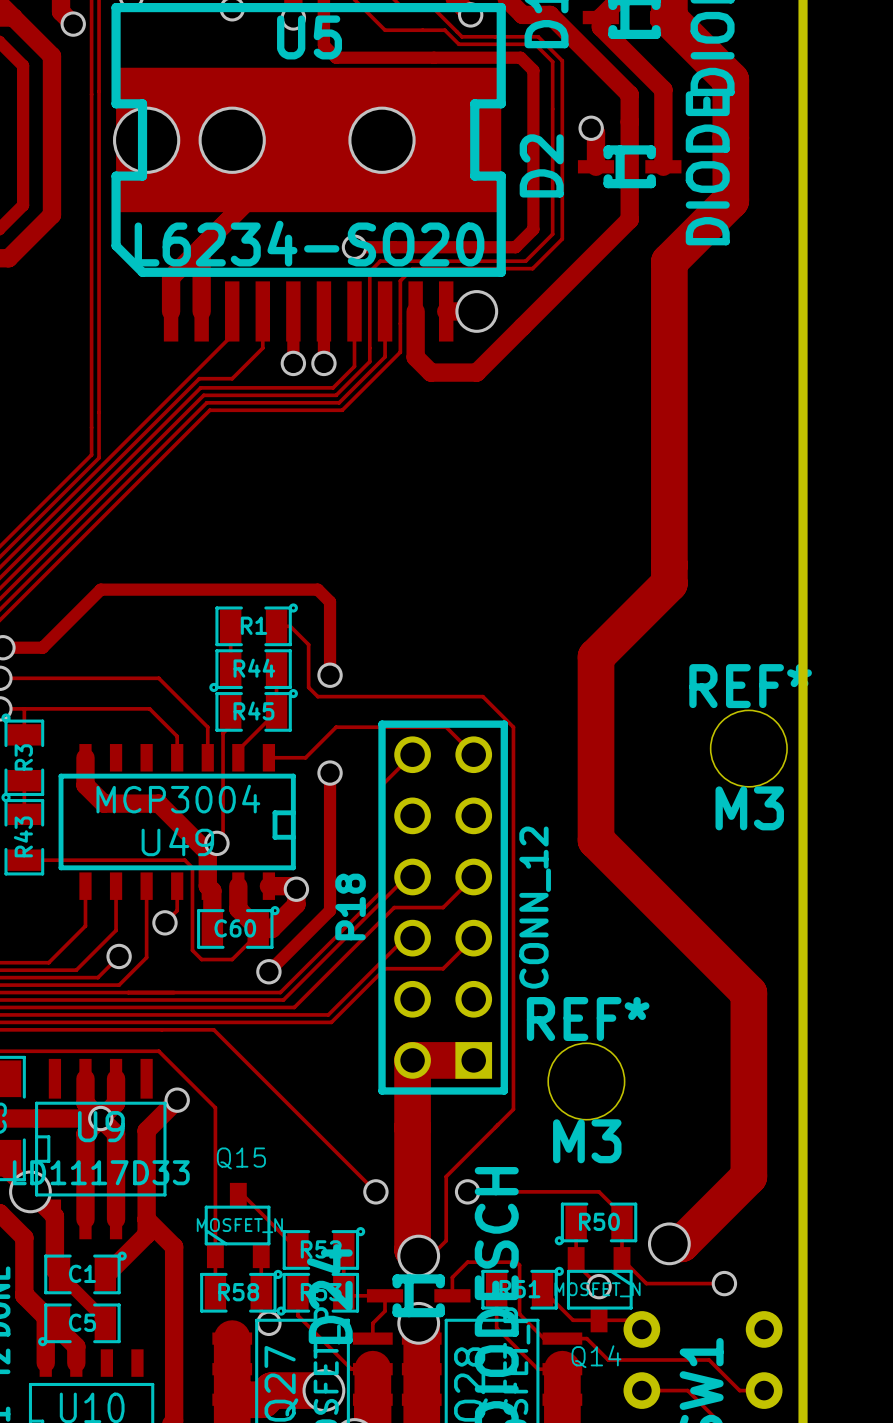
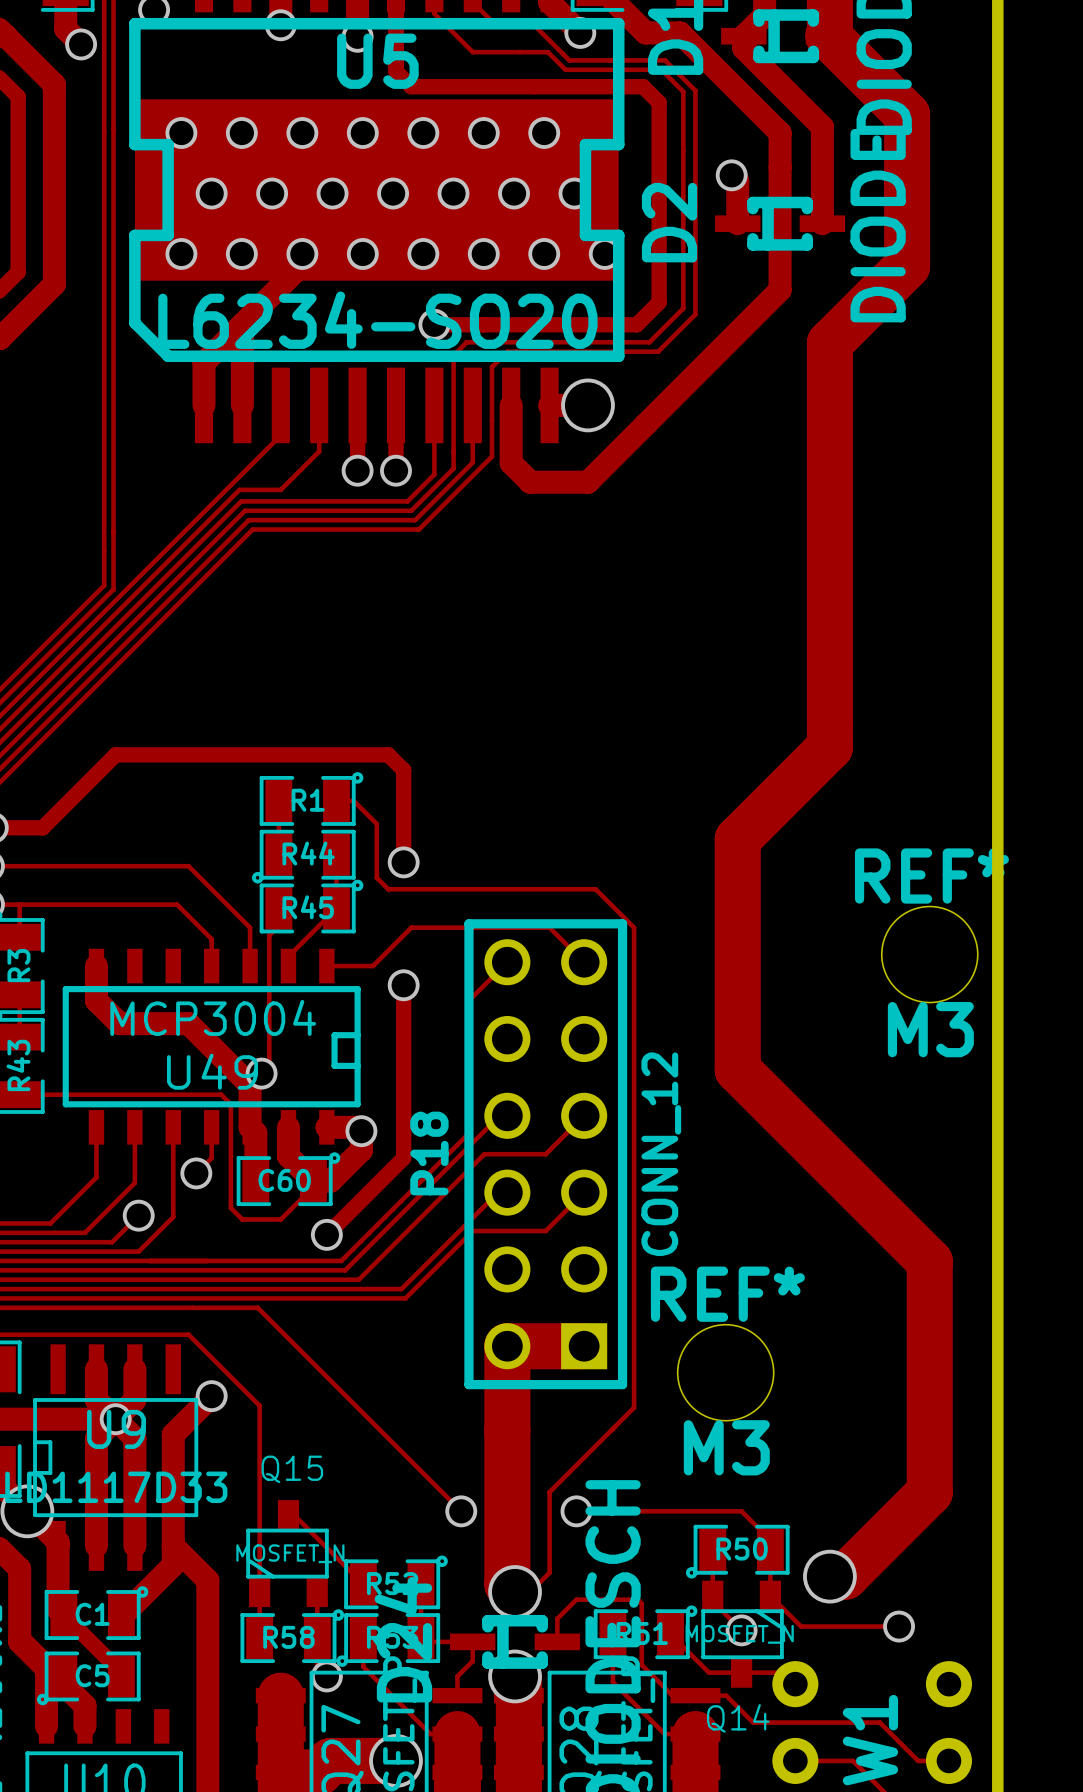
via: none -> (181, 133)
via: none -> (241, 133)
via: none -> (302, 133)
via: none -> (362, 133)
via: none -> (423, 133)
via: none -> (483, 133)
via: none -> (544, 133)
via size: [198, 106, 266, 174] -> [256, 177, 289, 210]
via size: [348, 106, 416, 174] -> [437, 177, 470, 210]
via: (146, 140) -> none
via: none -> (211, 193)
via: none -> (332, 193)
via: none -> (393, 193)
via: none -> (514, 193)
via: none -> (574, 193)
via: none -> (181, 253)
via: none -> (241, 253)
via: none -> (302, 253)
via: none -> (362, 253)
via: none -> (423, 253)
via: none -> (483, 253)
via: none -> (544, 253)
via: none -> (604, 253)

